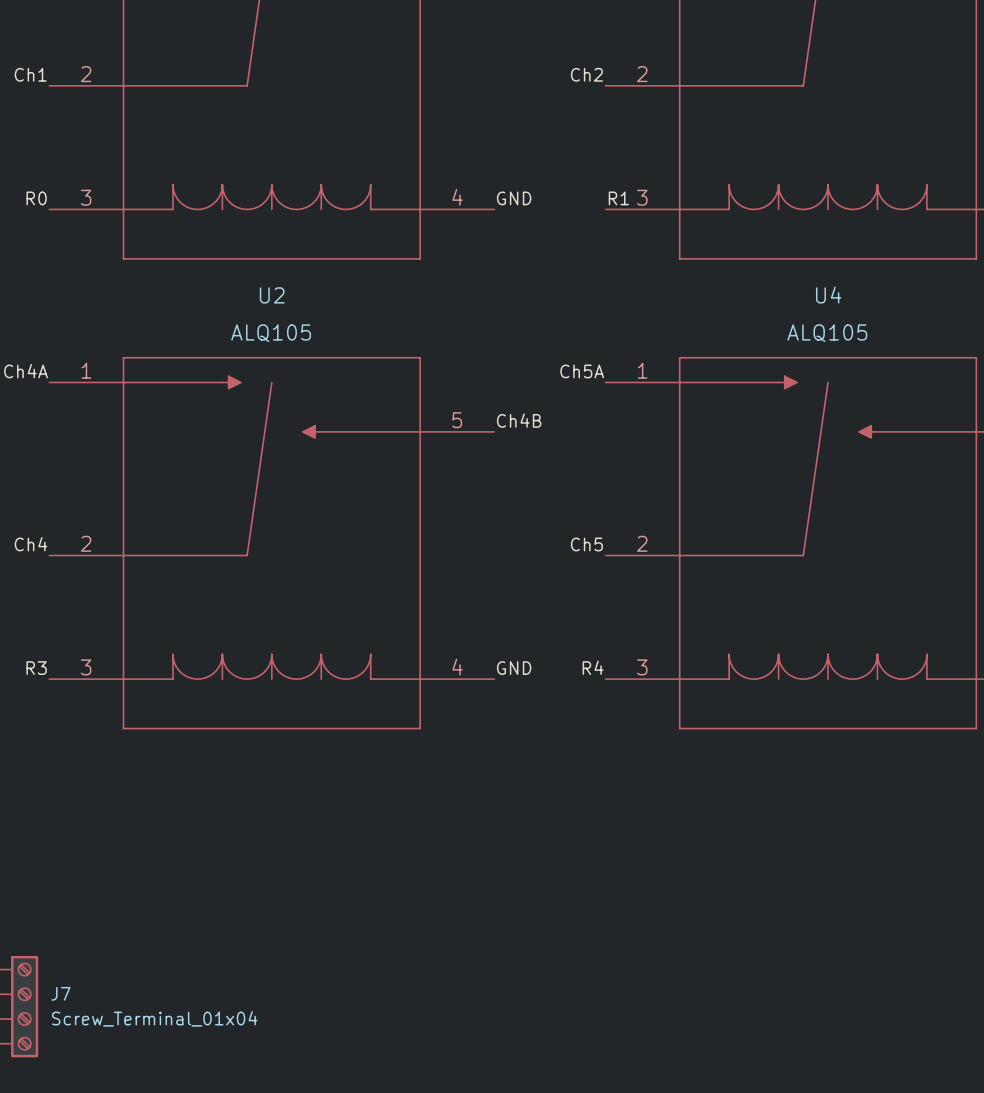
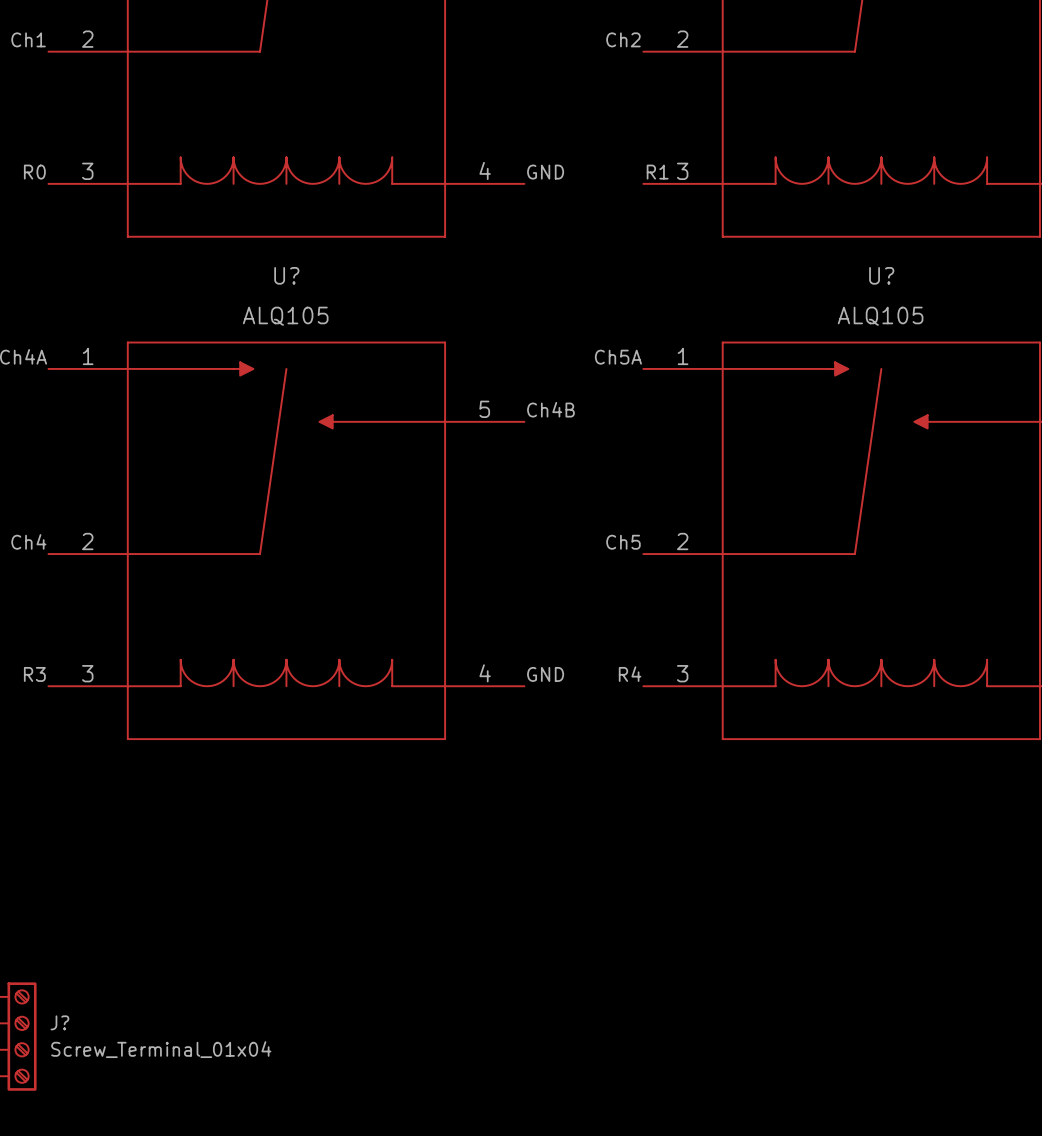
U2 name: U2 (272, 295) -> U? (286, 275)
U4 name: U4 (828, 295) -> U? (881, 275)
J7 name: J7 (60, 993) -> J? (59, 1022)

